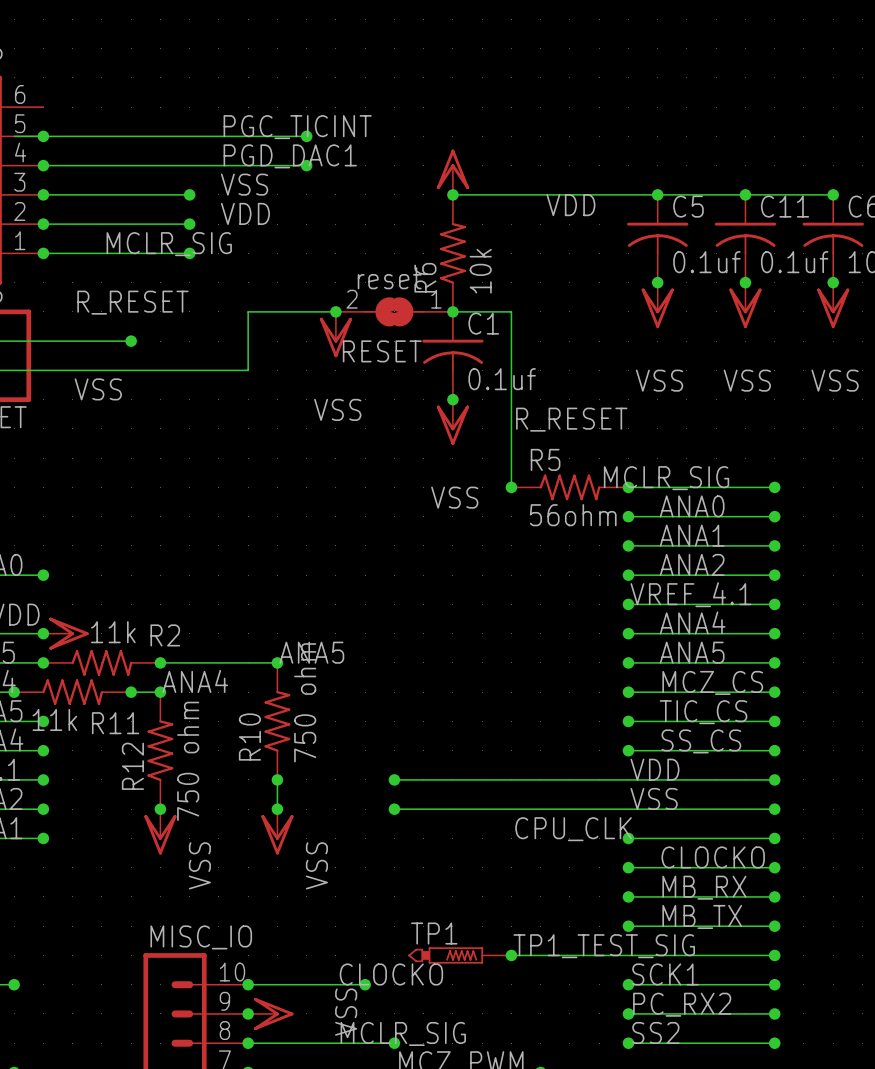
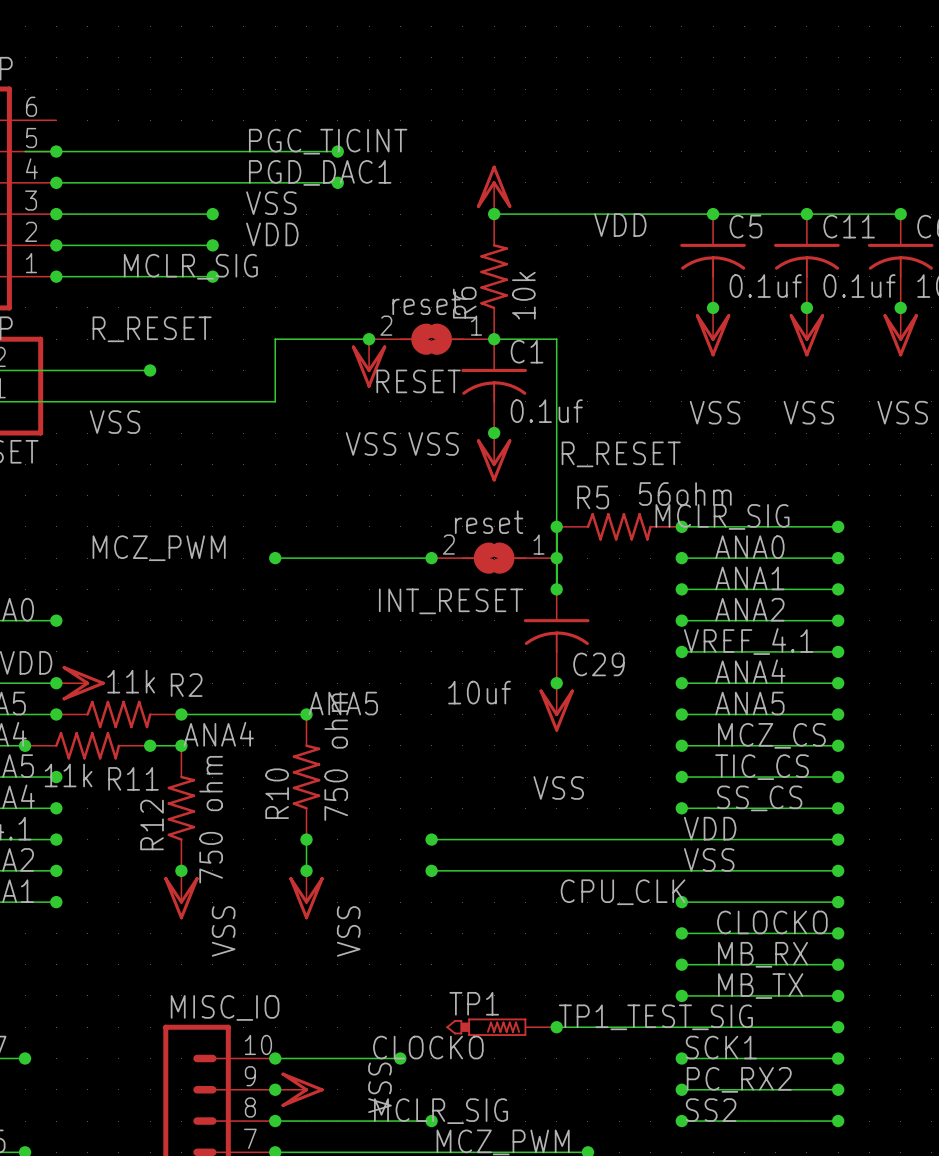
wire: none -> (556, 526) (556, 589)
power symbol text position: VSS (454, 497) -> VSS (433, 443)
label: none -> MCZ_PWM (159, 548)
R5 value position: 56ohm (573, 515) -> 56ohm (685, 494)
wire: none -> (275, 558) (431, 558)
junction: none -> (275, 558)
junction: none -> (431, 558)
INT_RESET: none -> reset (494, 558)
junction: none -> (556, 558)
junction: none -> (556, 589)
C29: none -> 10uf (556, 636)
junction: none -> (556, 683)
power symbol: none -> VSS (556, 707)

